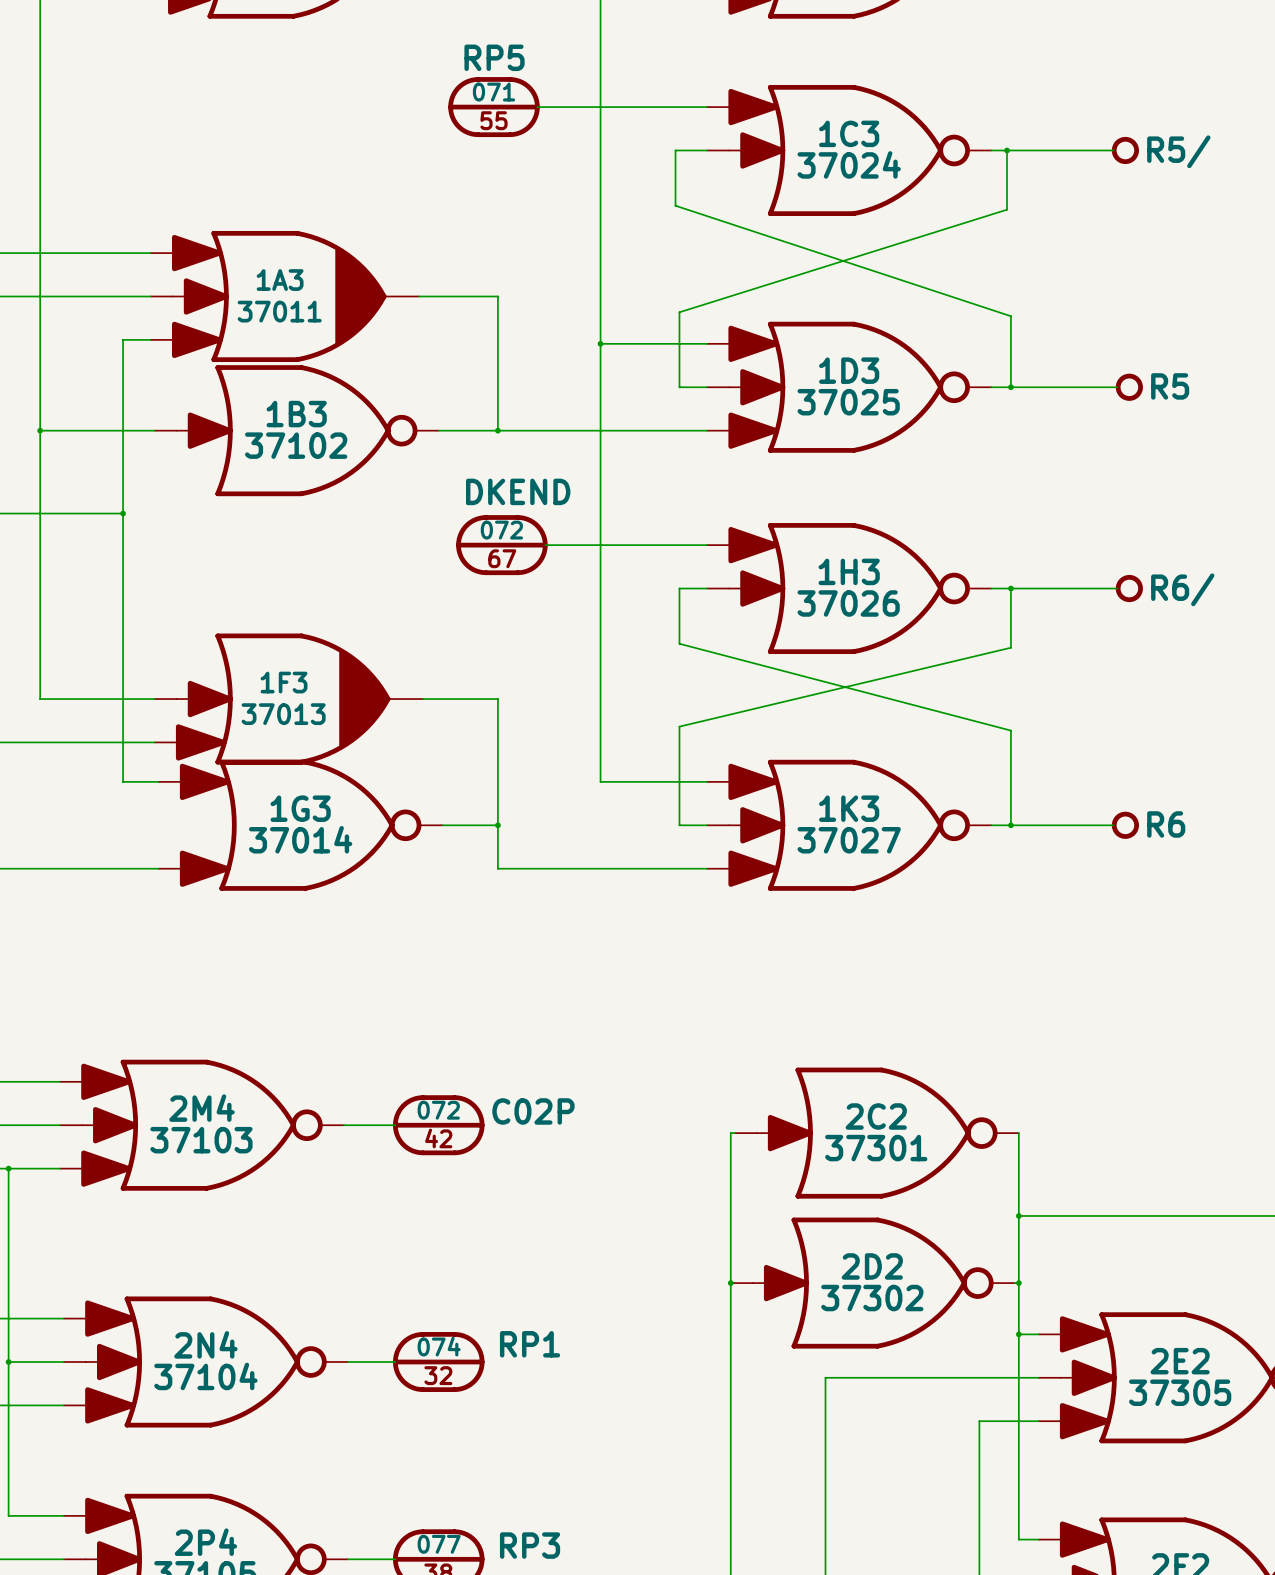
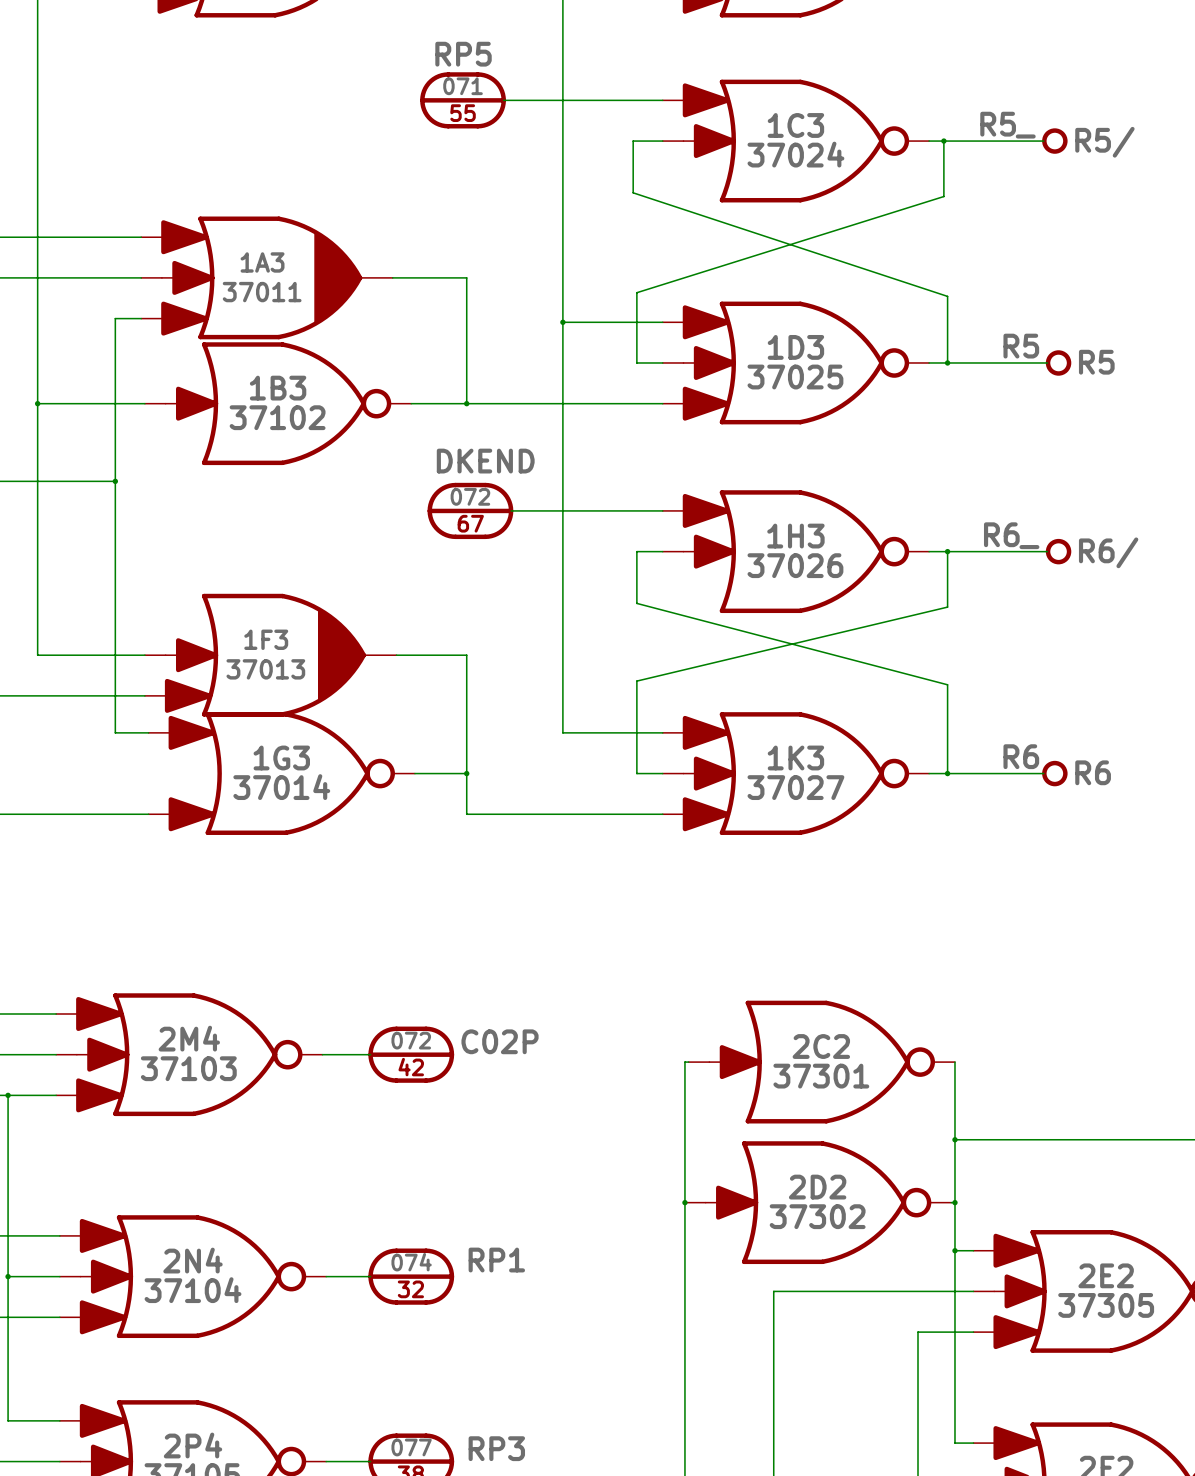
label: none -> R5_ (1007, 125)
label: none -> R5 (1021, 346)
label: none -> R6_ (1011, 535)
label: none -> R6 (1021, 756)

